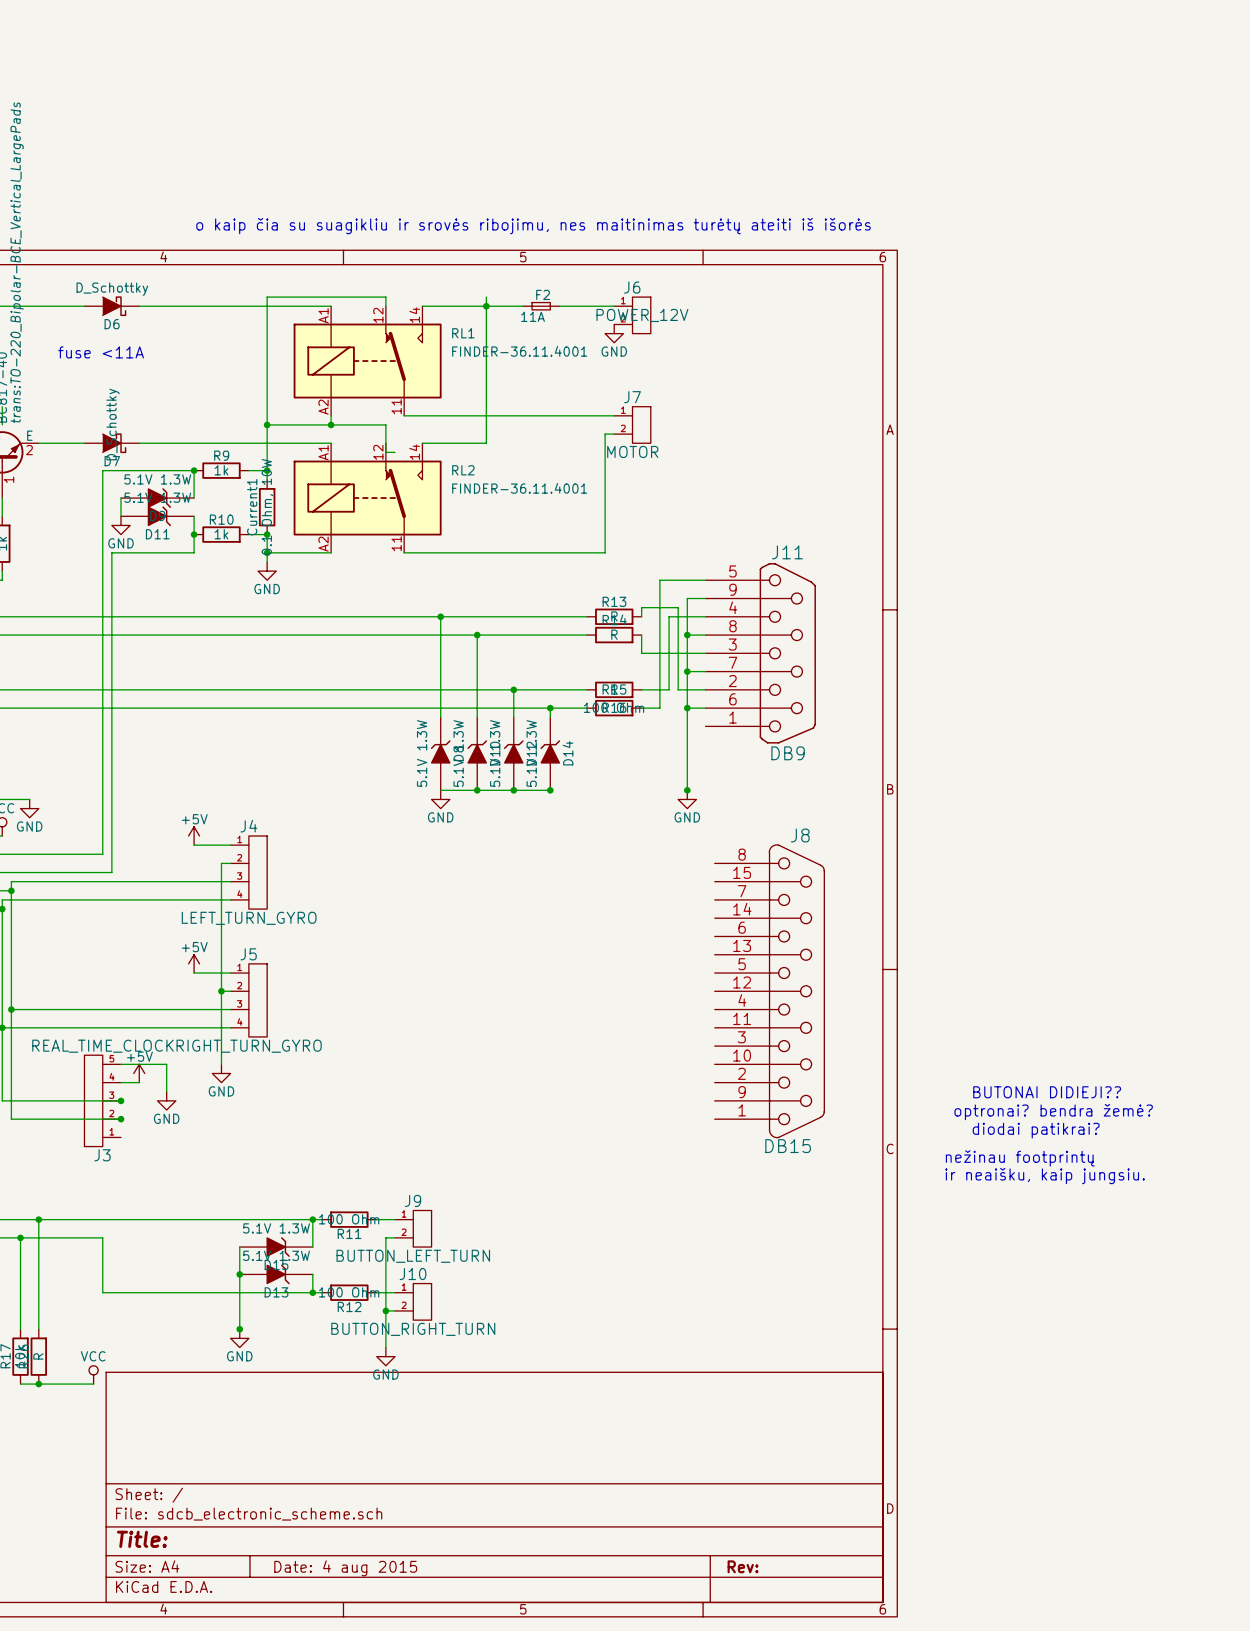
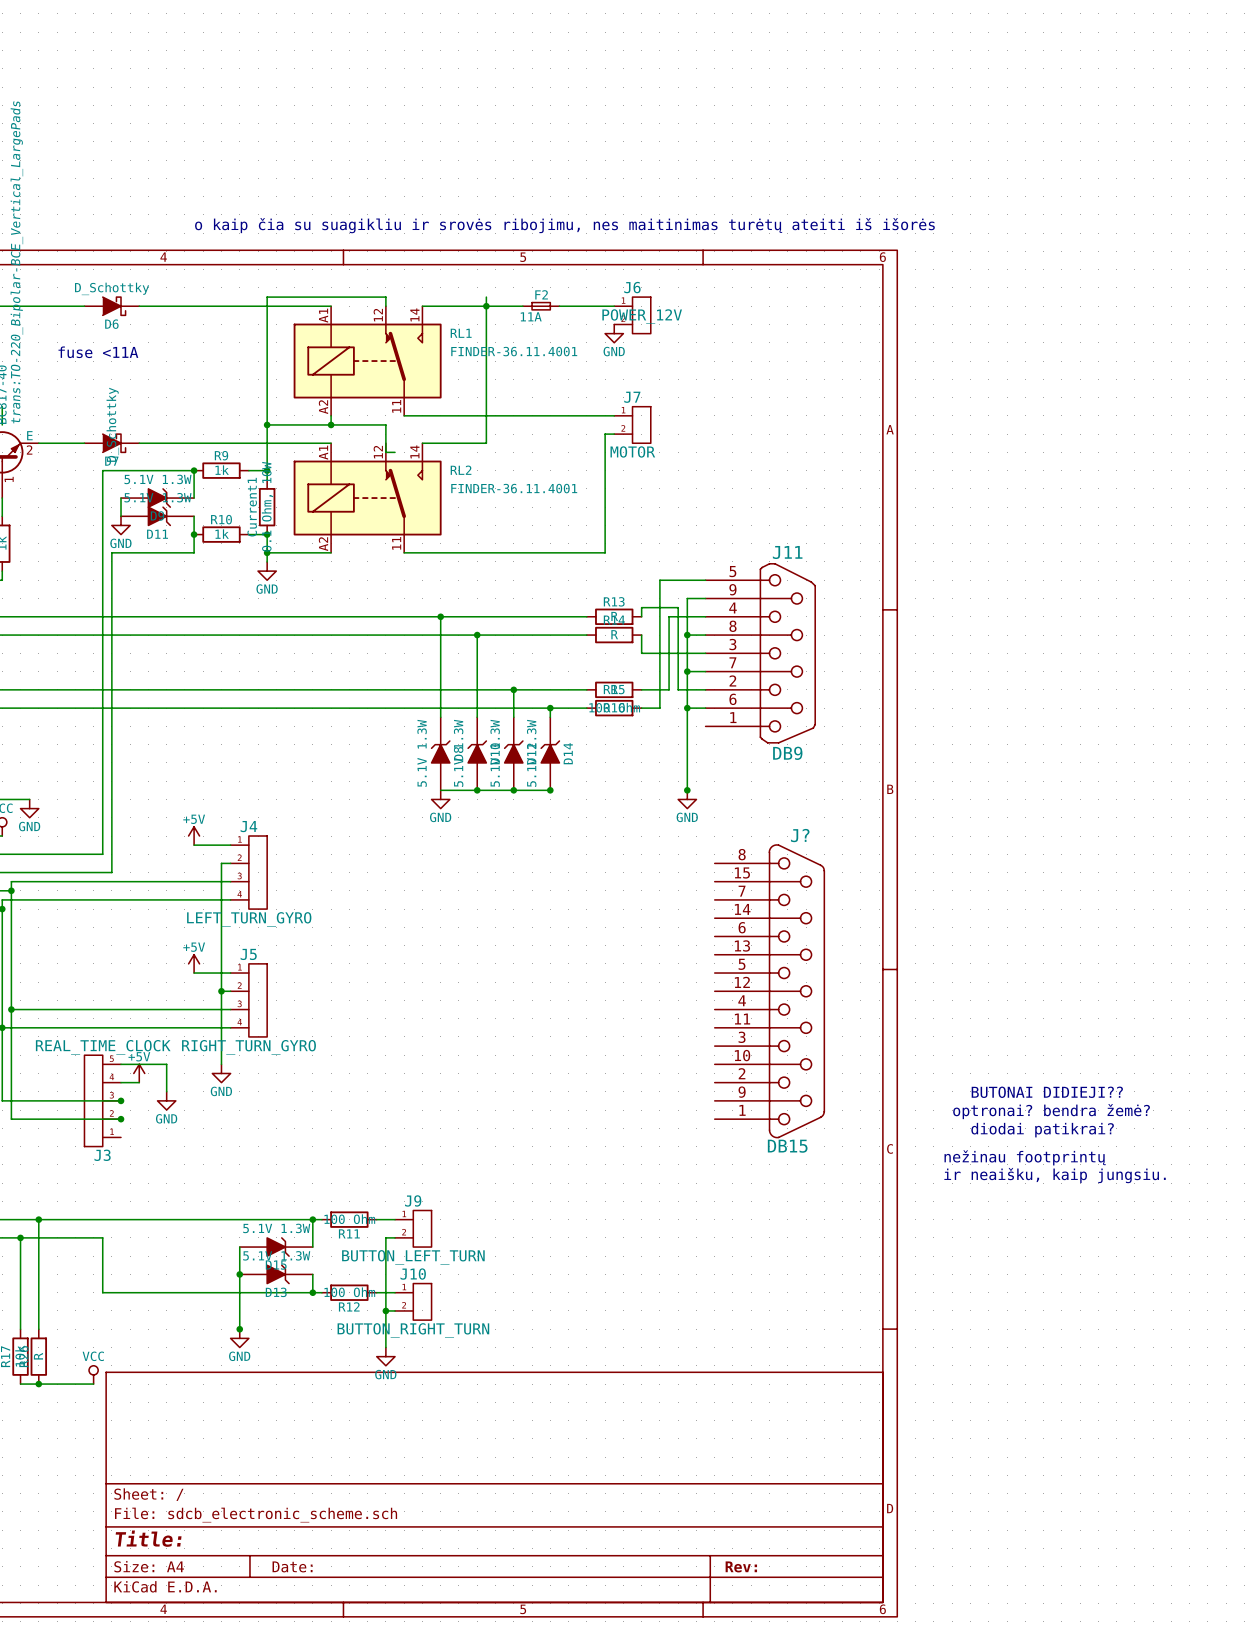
J8 name: J8 (800, 835) -> J? (800, 835)
title block: Date: 4 aug 2015 (345, 1568) -> Date: (292, 1566)

